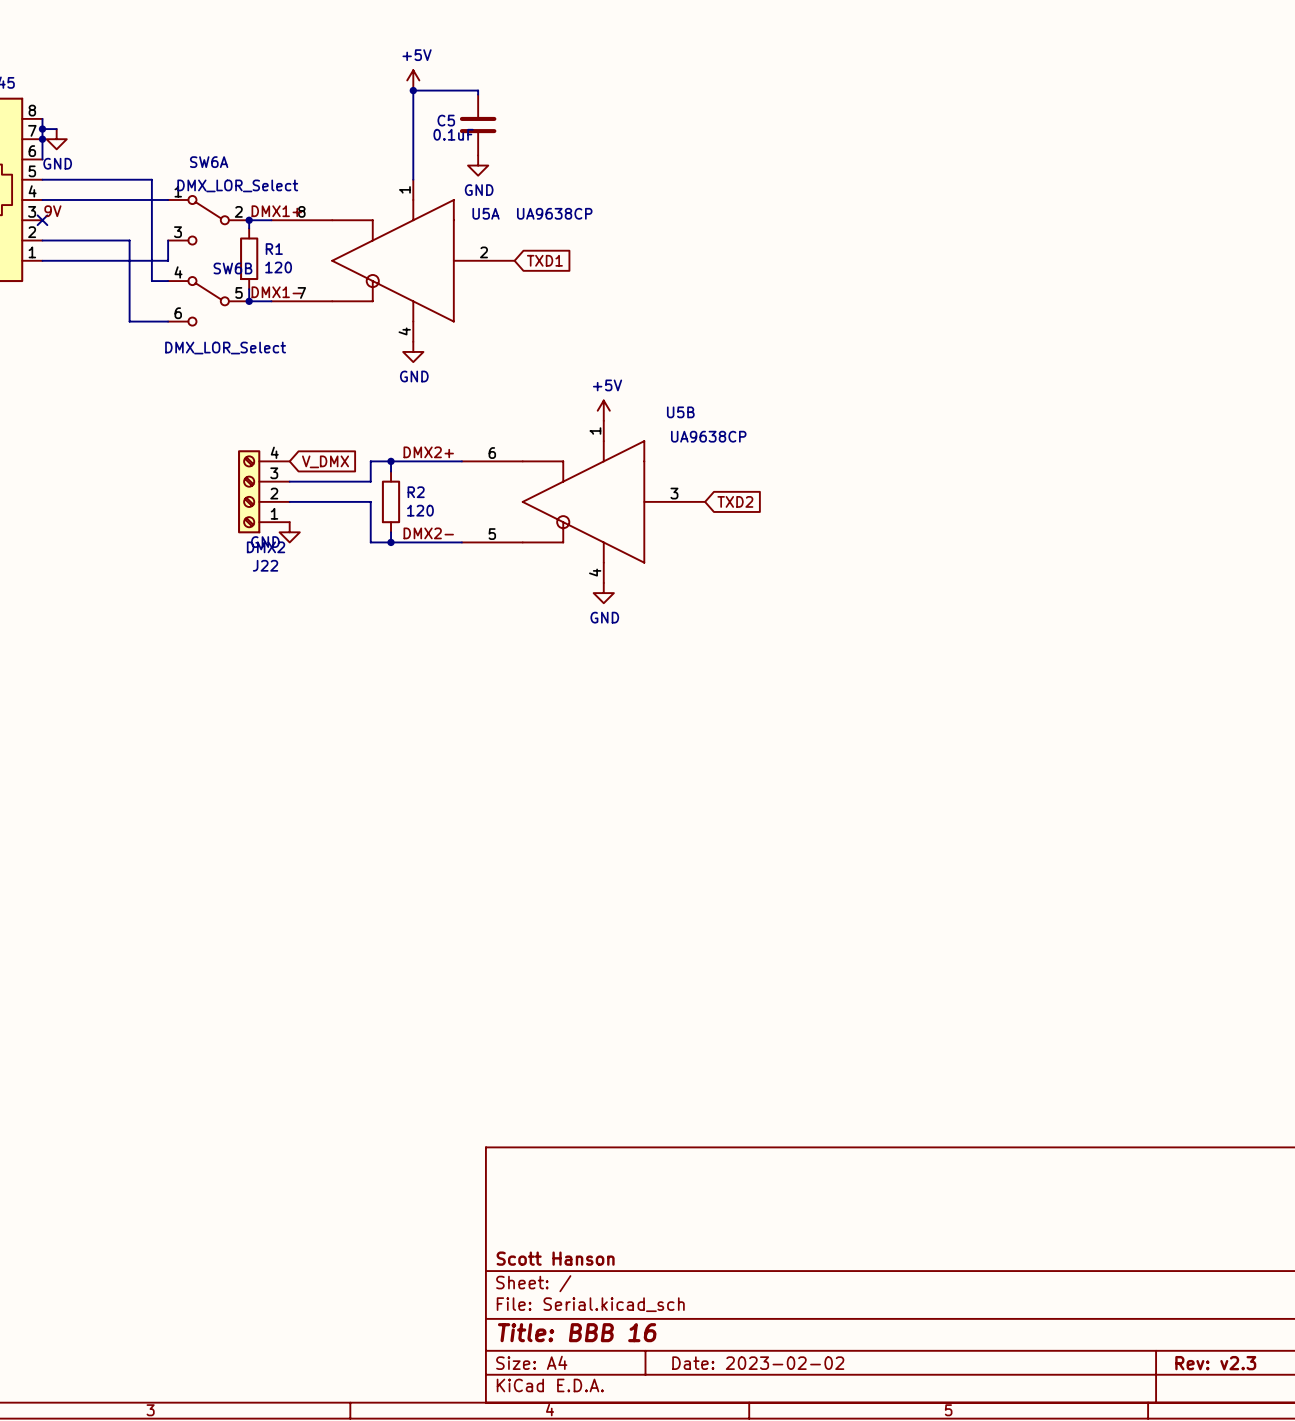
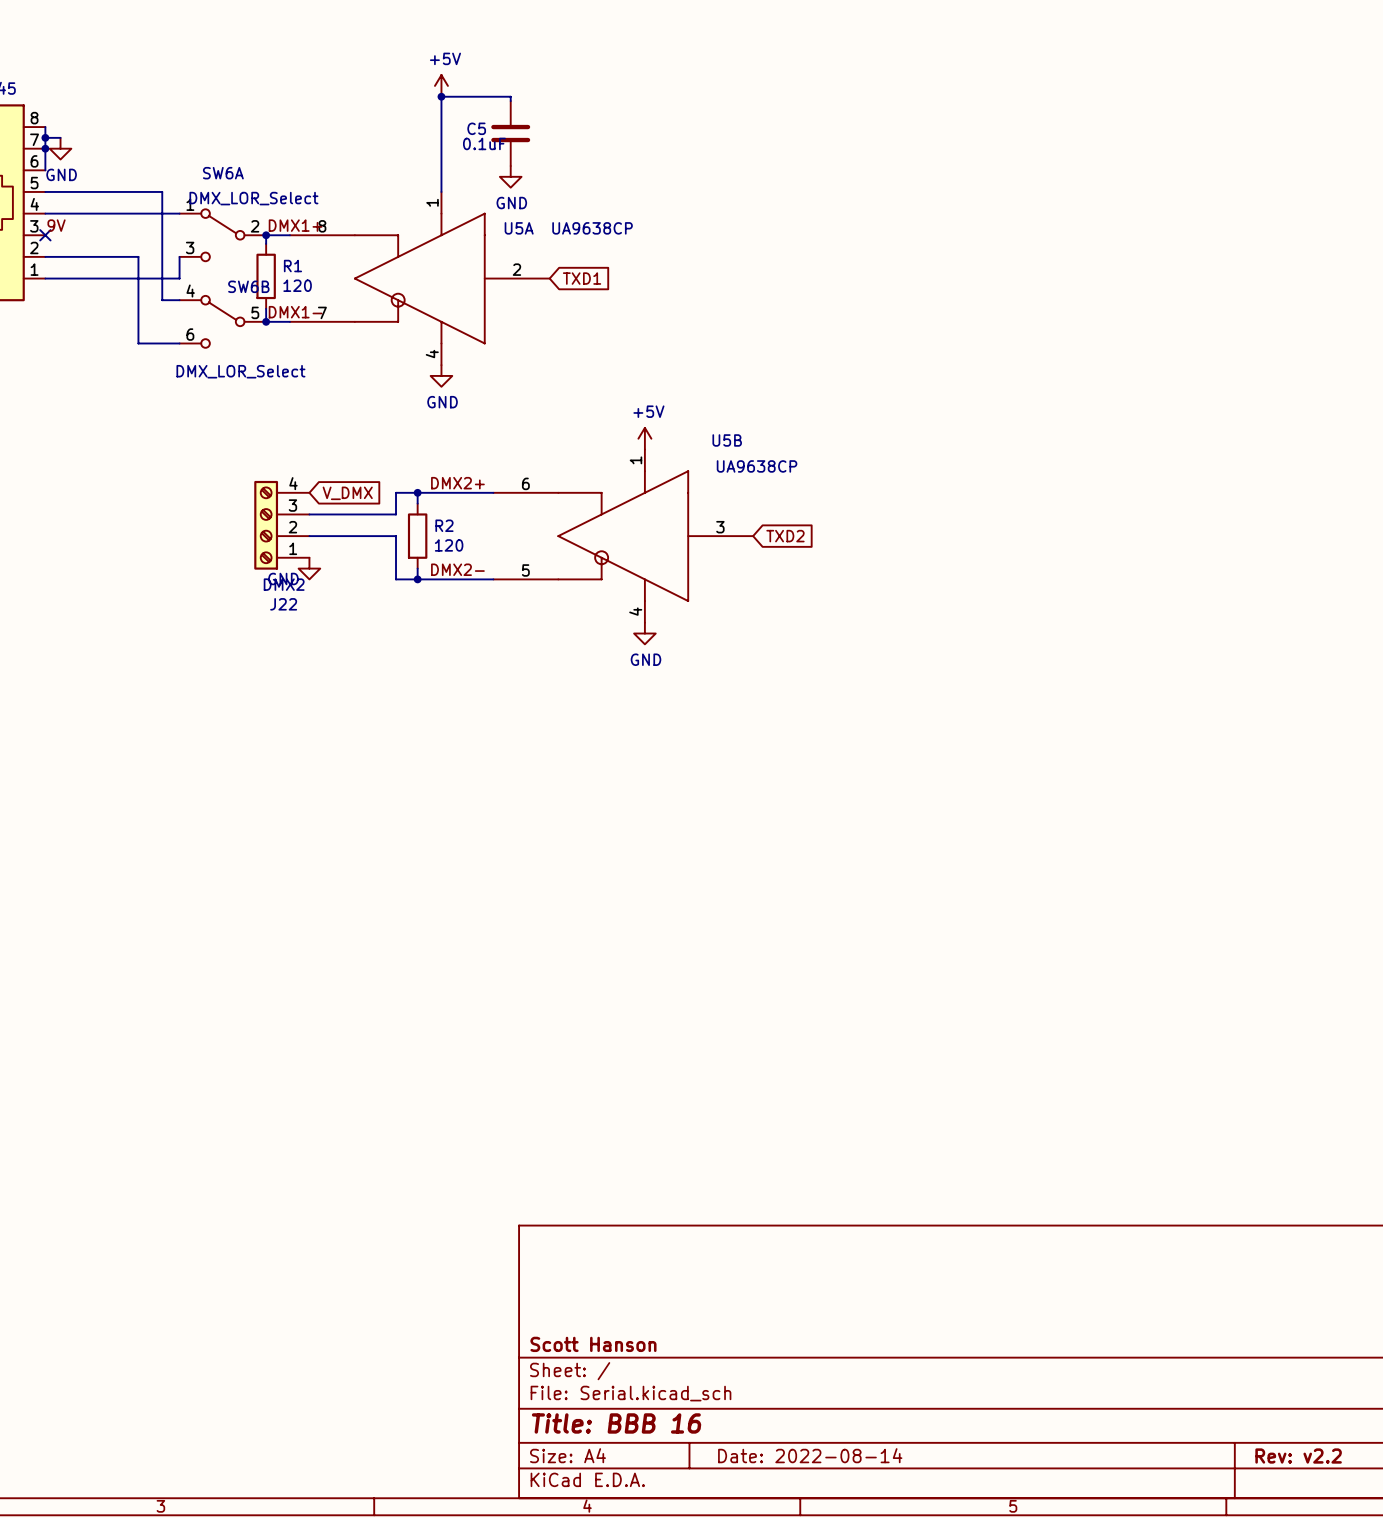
title block: Date: 2023-02-02 (758, 1363) -> Date: 2022-08-14 (810, 1455)
title block: Rev: v2.3 (1215, 1363) -> Rev: v2.2 (1298, 1456)

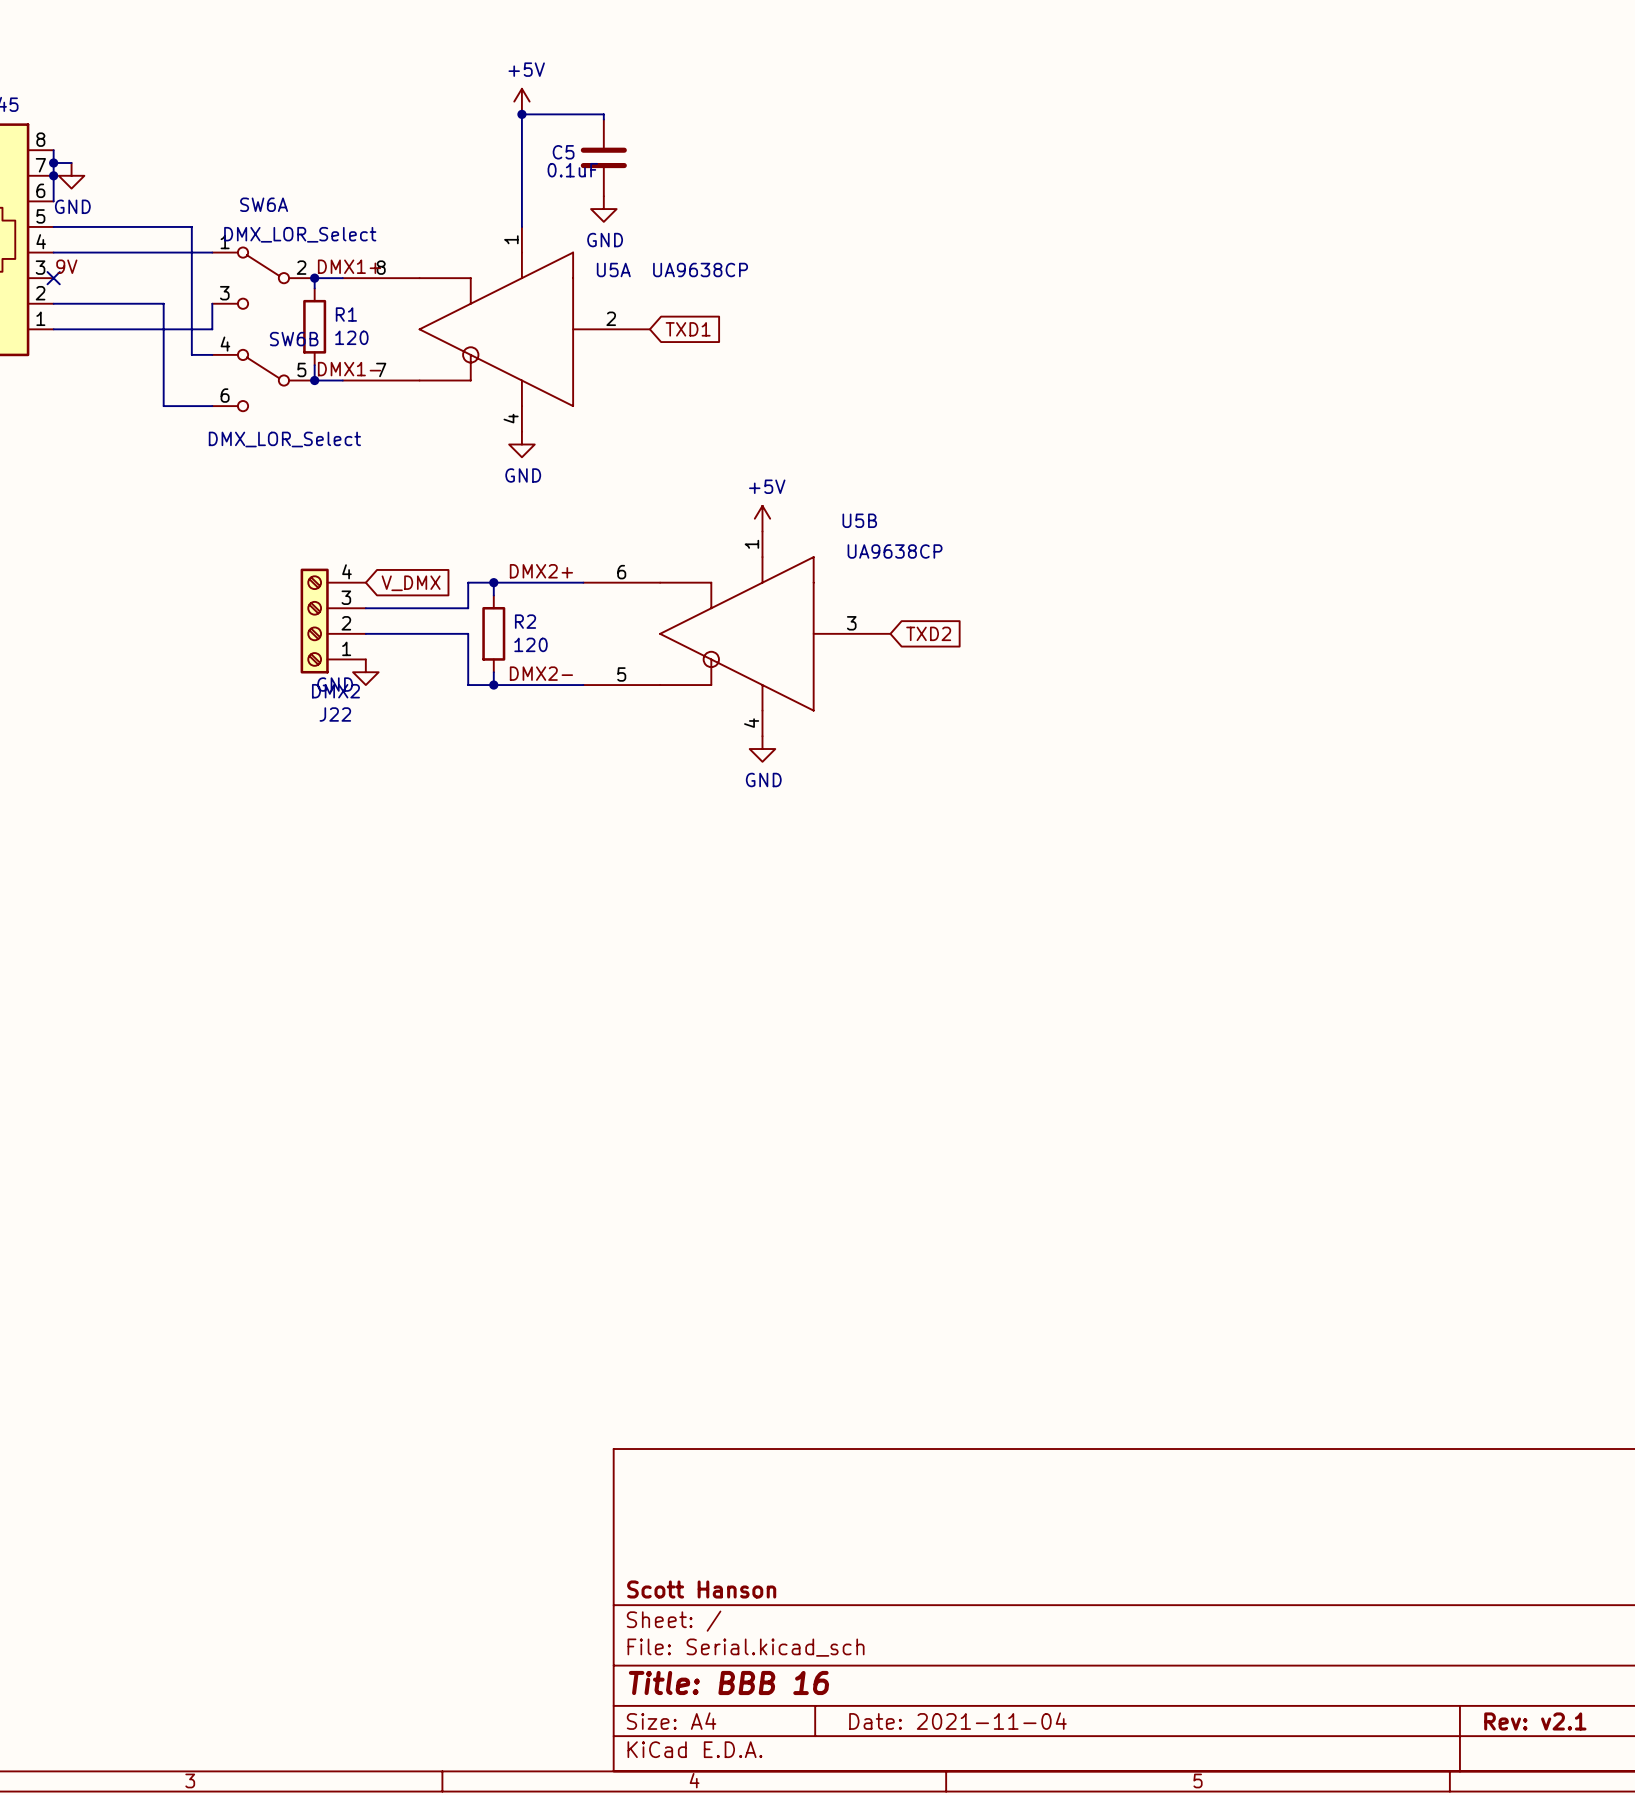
title block: Date: 2022-08-14 (810, 1455) -> Date: 2021-11-04 (957, 1721)
title block: Rev: v2.2 (1298, 1456) -> Rev: v2.1 (1535, 1721)

